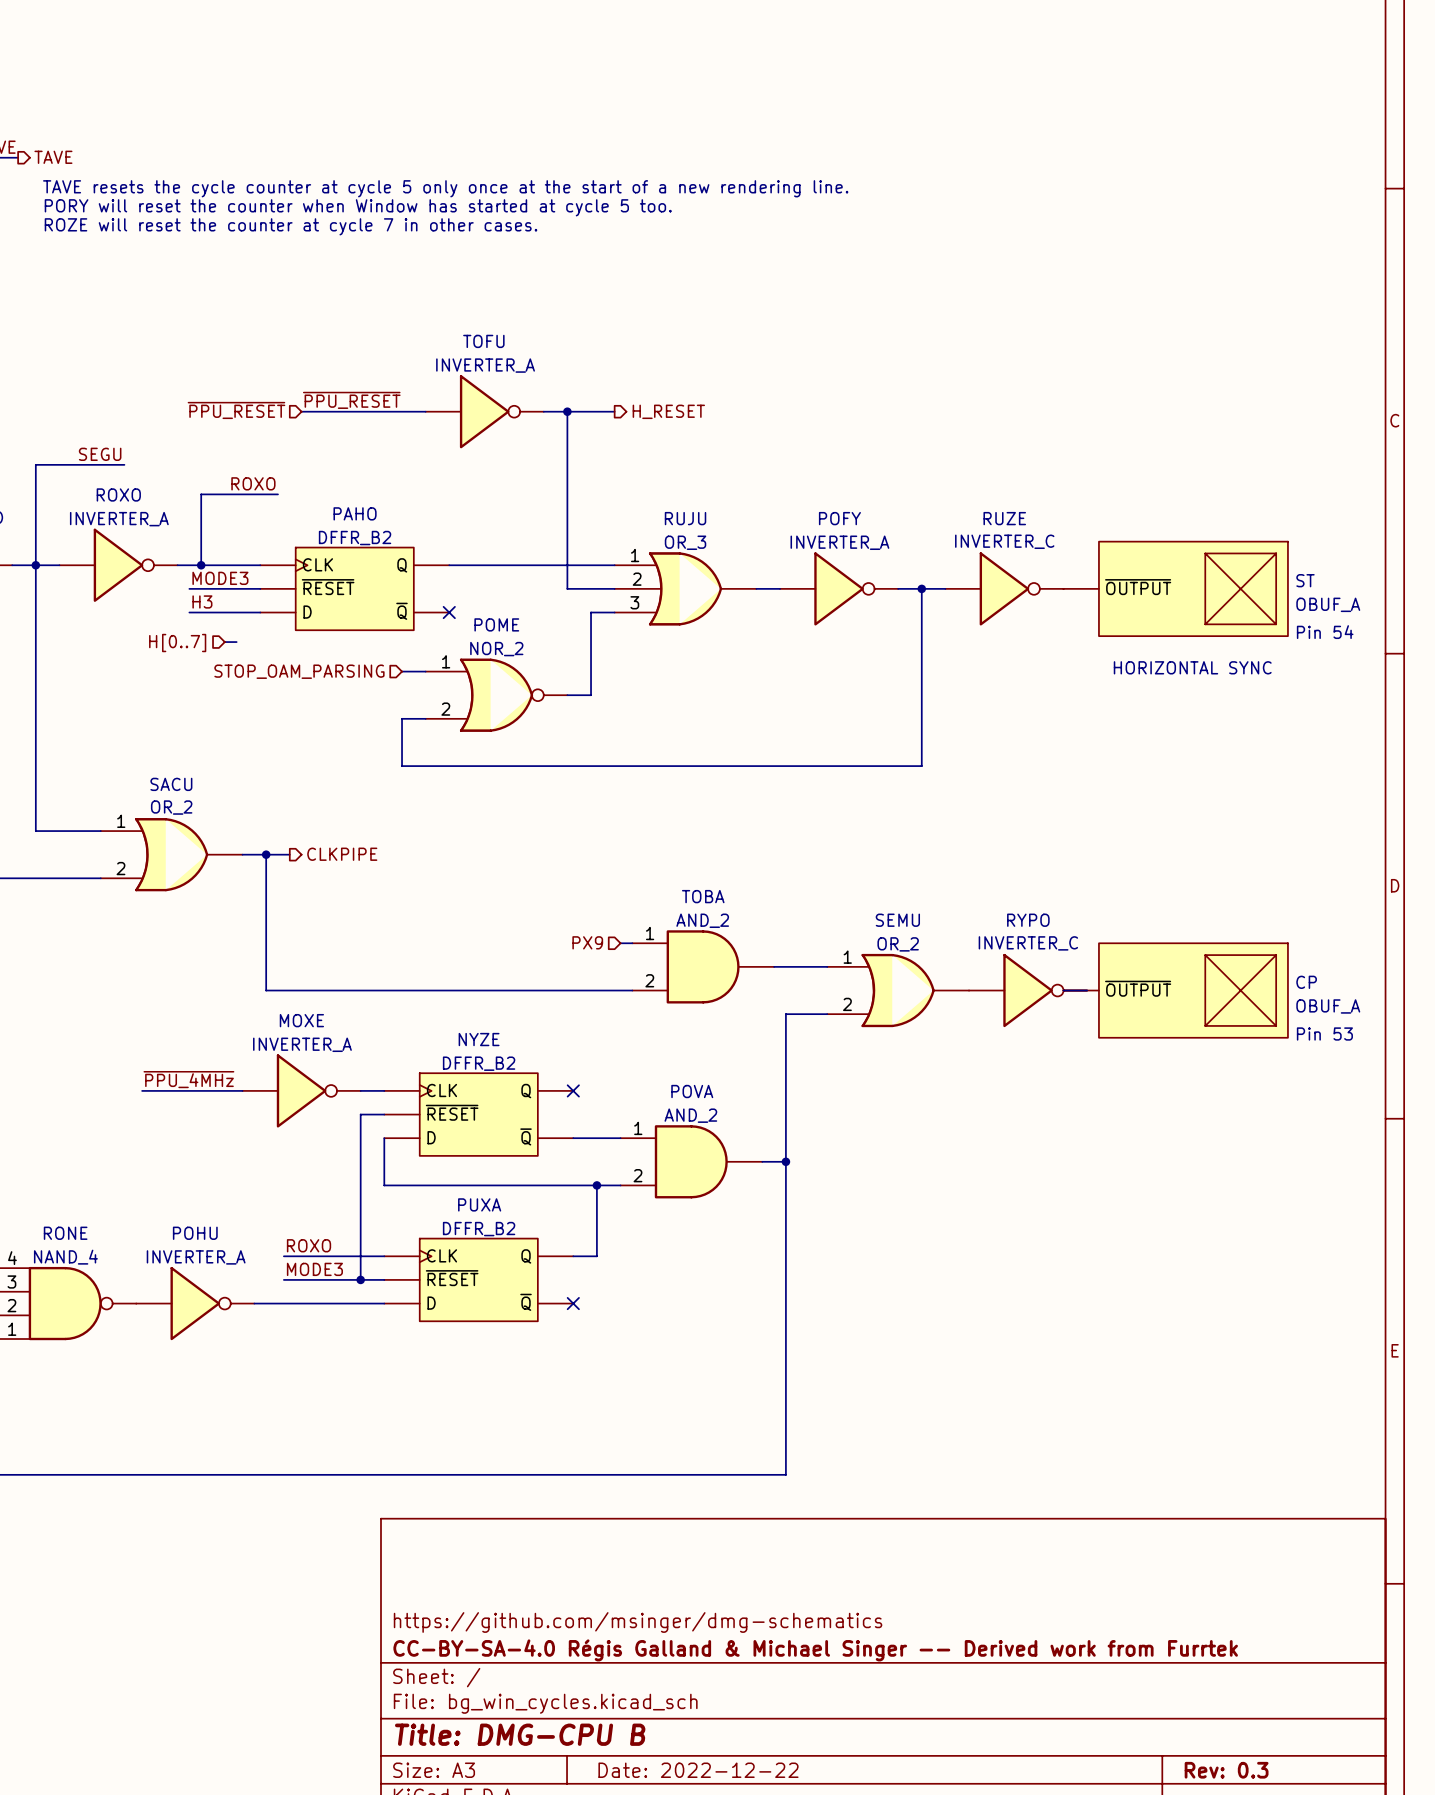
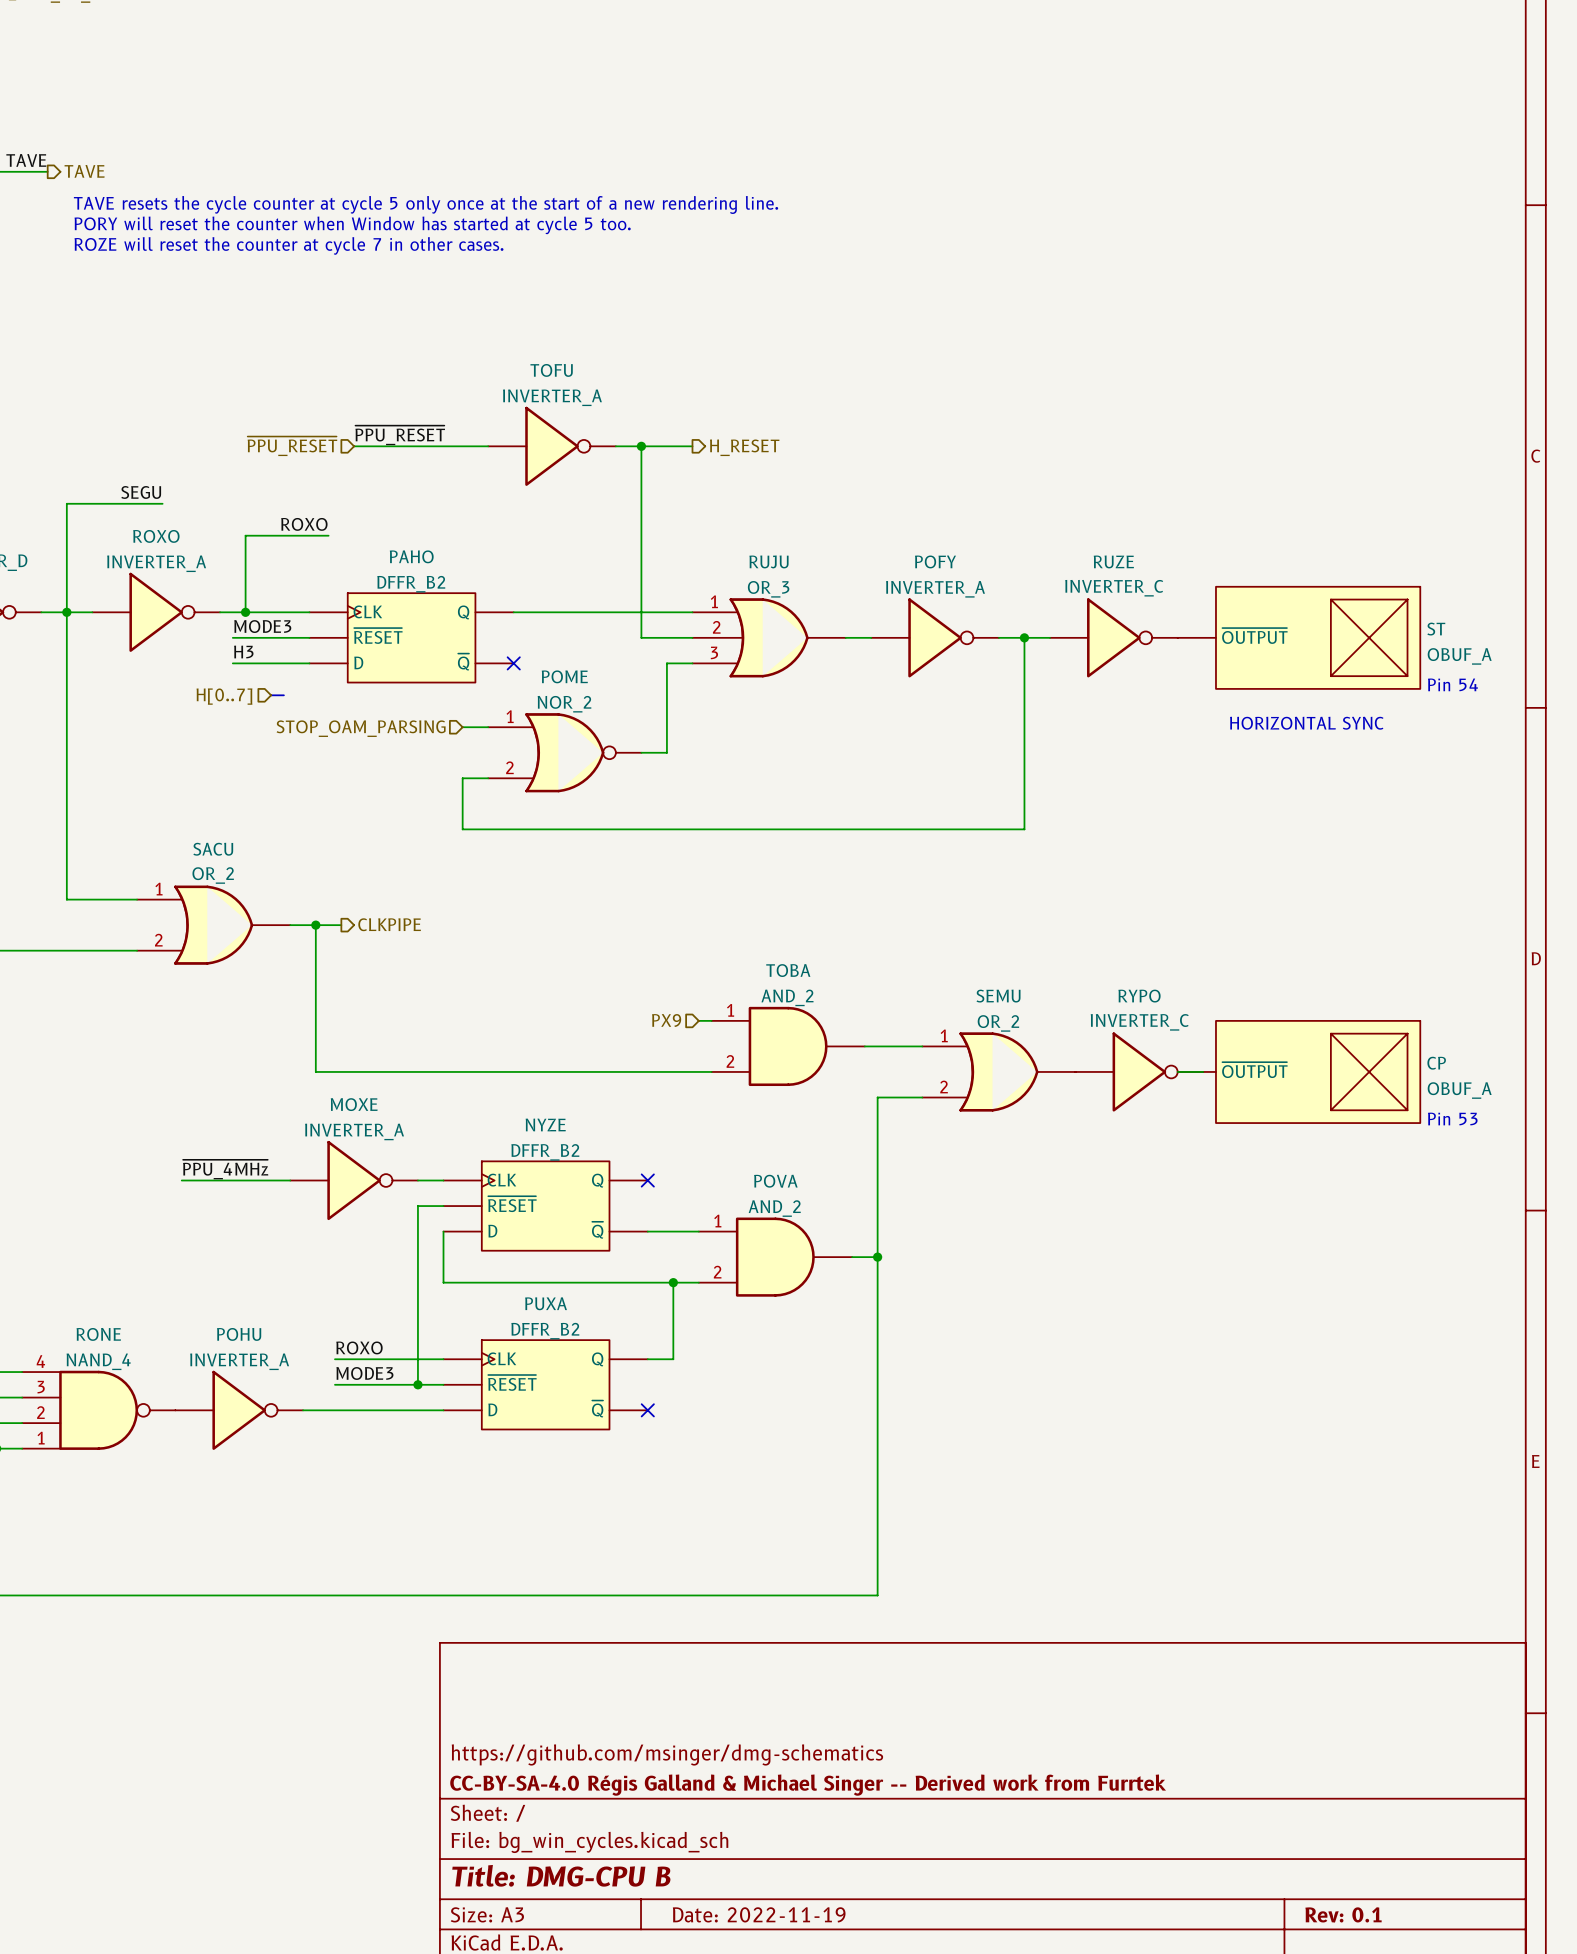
title block: Date: 2022-12-22 (698, 1770) -> Date: 2022-11-19 (759, 1914)
title block: Rev: 0.3 (1226, 1770) -> Rev: 0.1 (1343, 1914)

